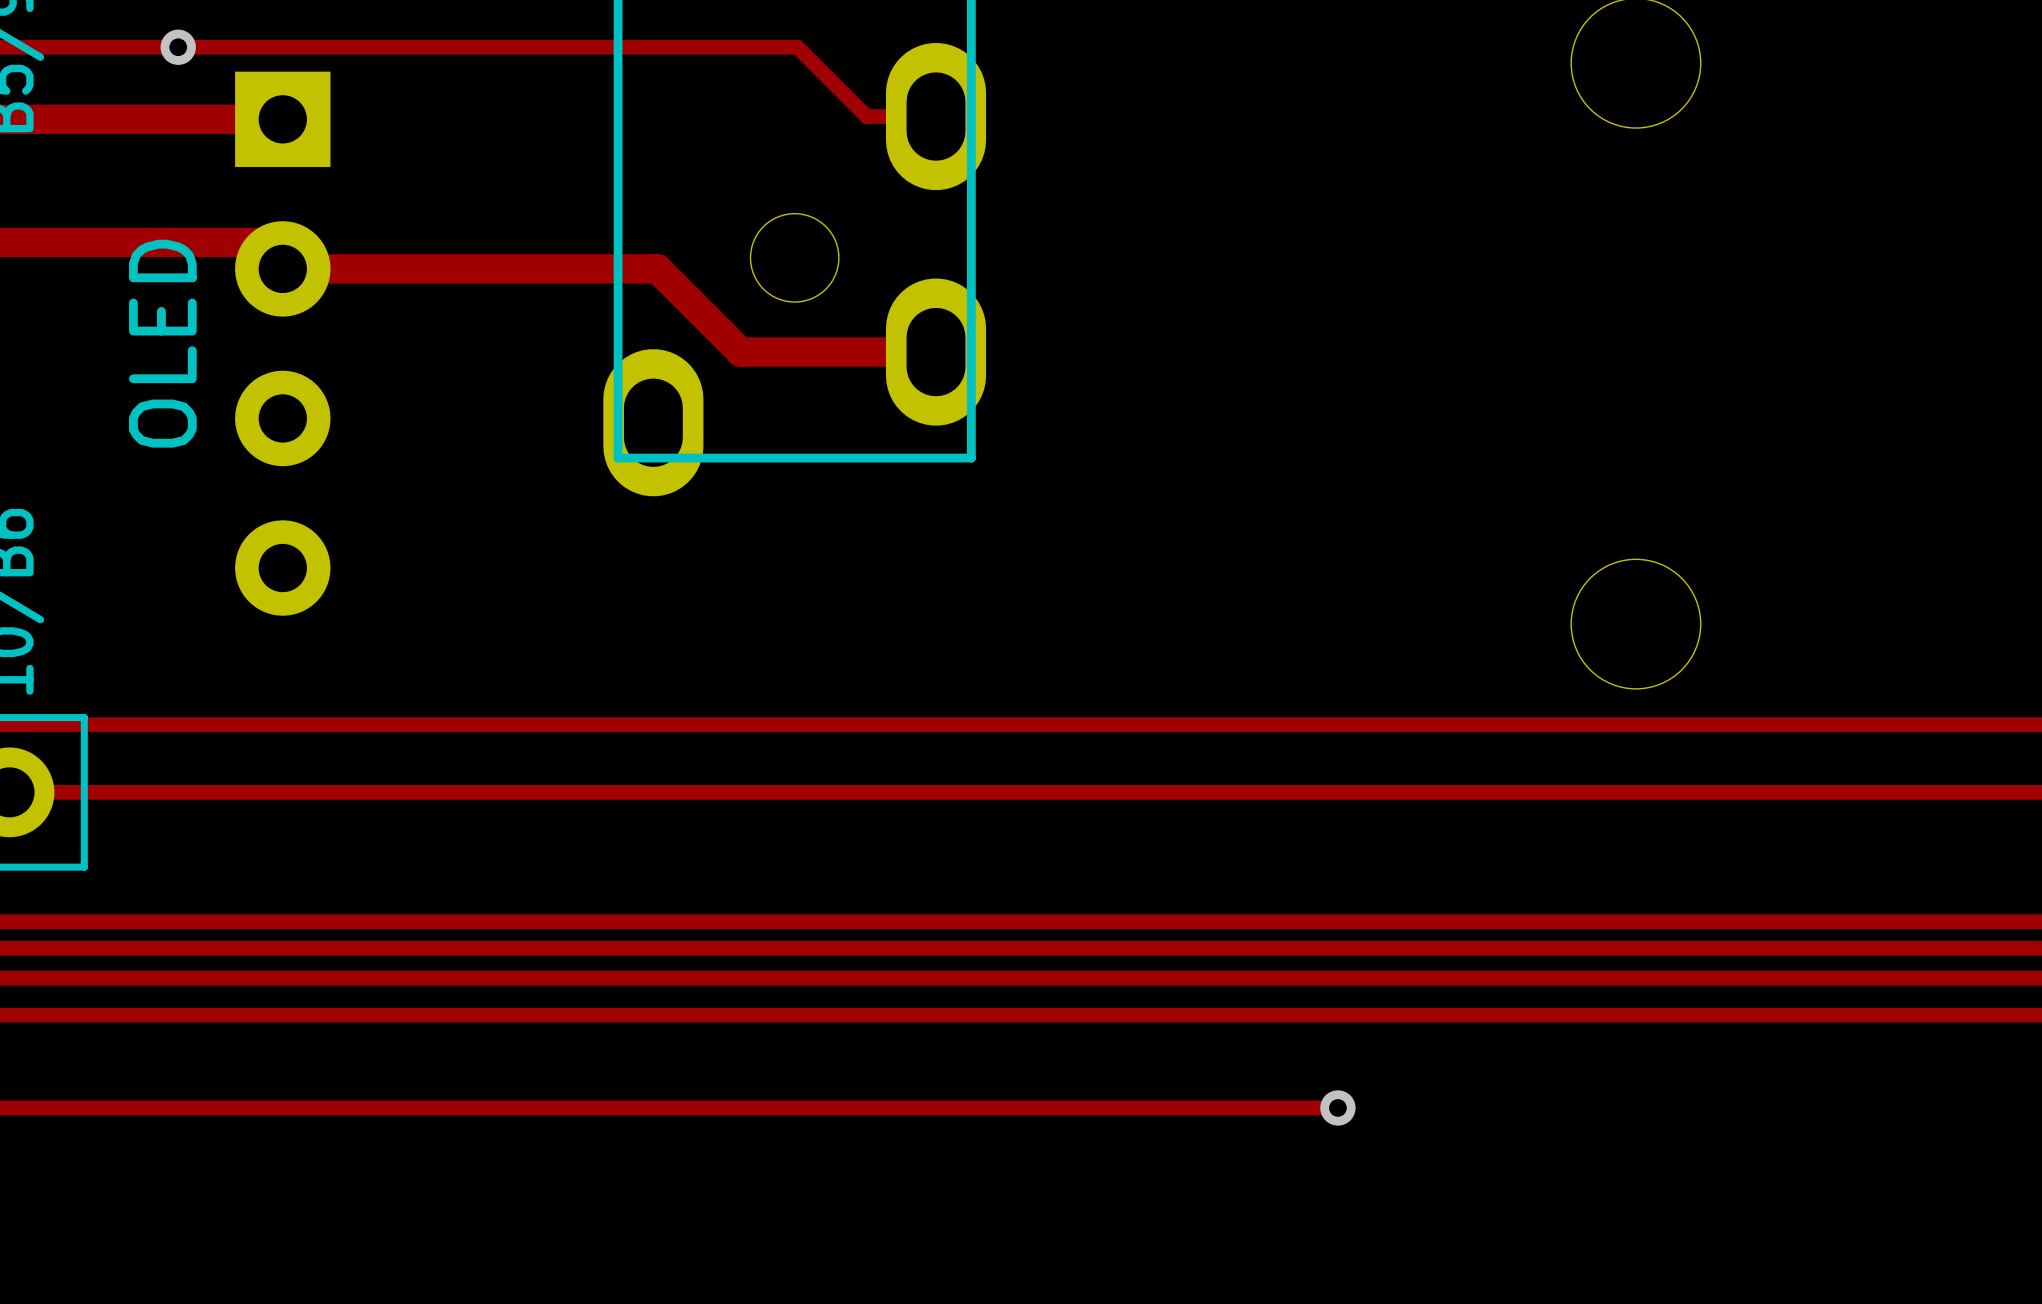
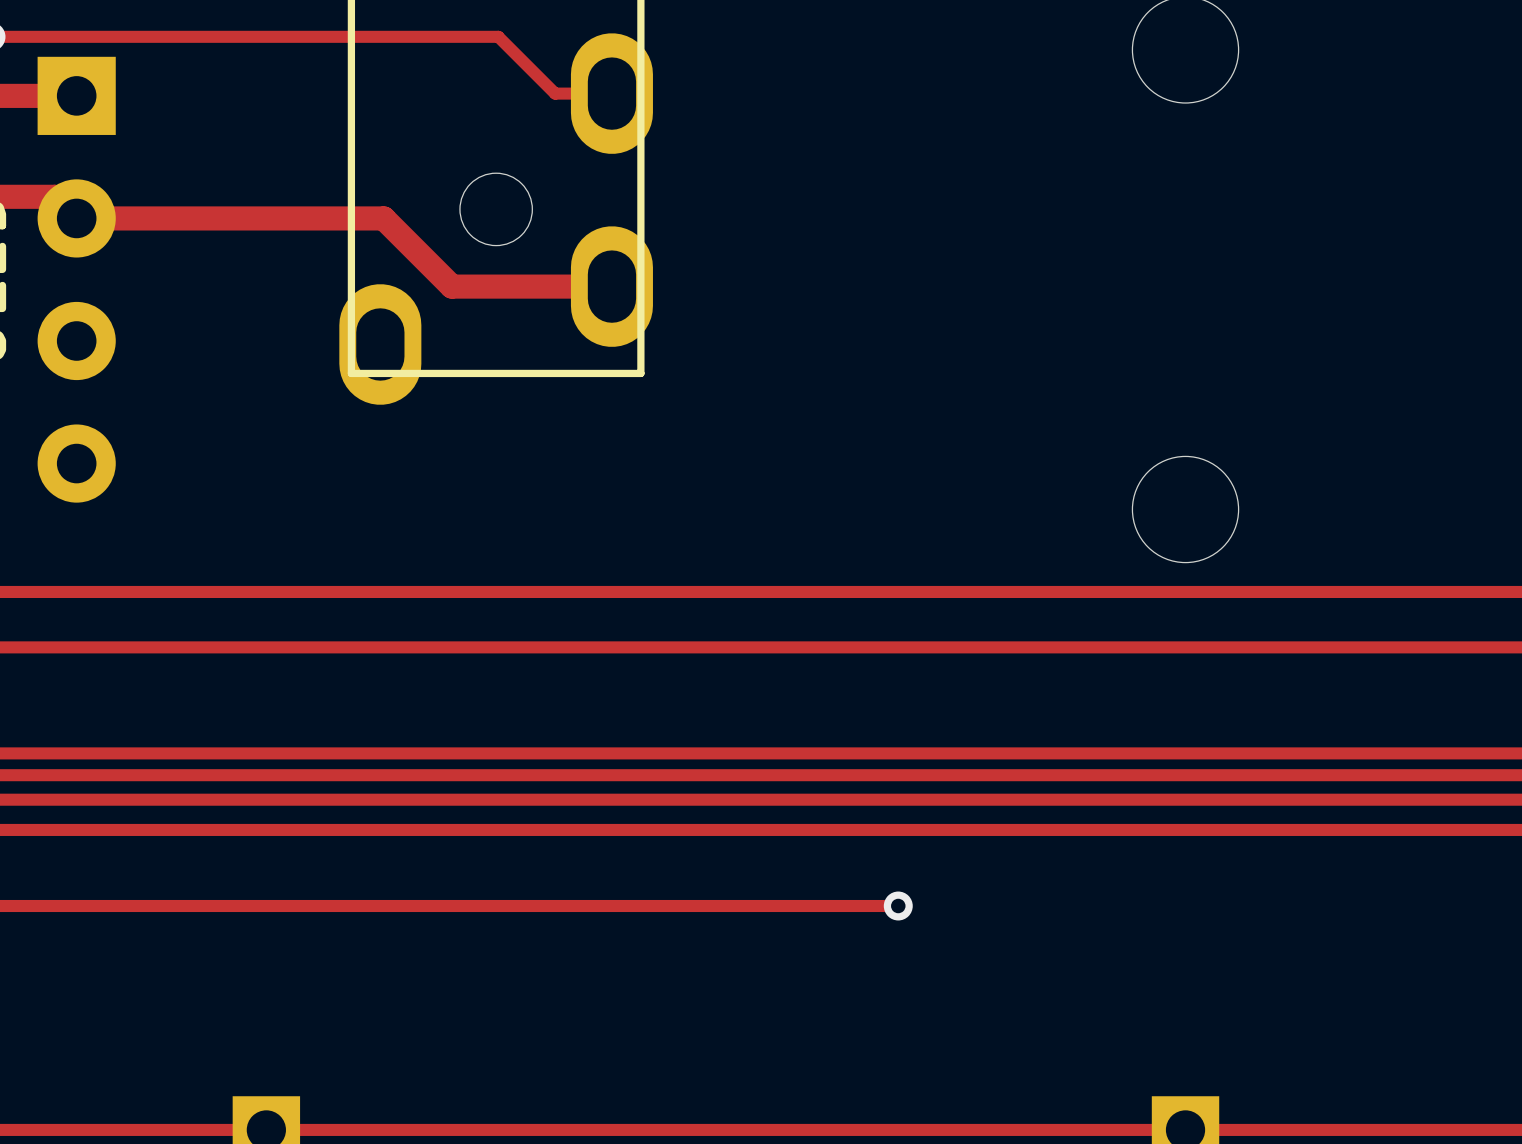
track: (1285, 1107) (1337, 1107) -> none
via position: (1337, 1107) -> (898, 906)

